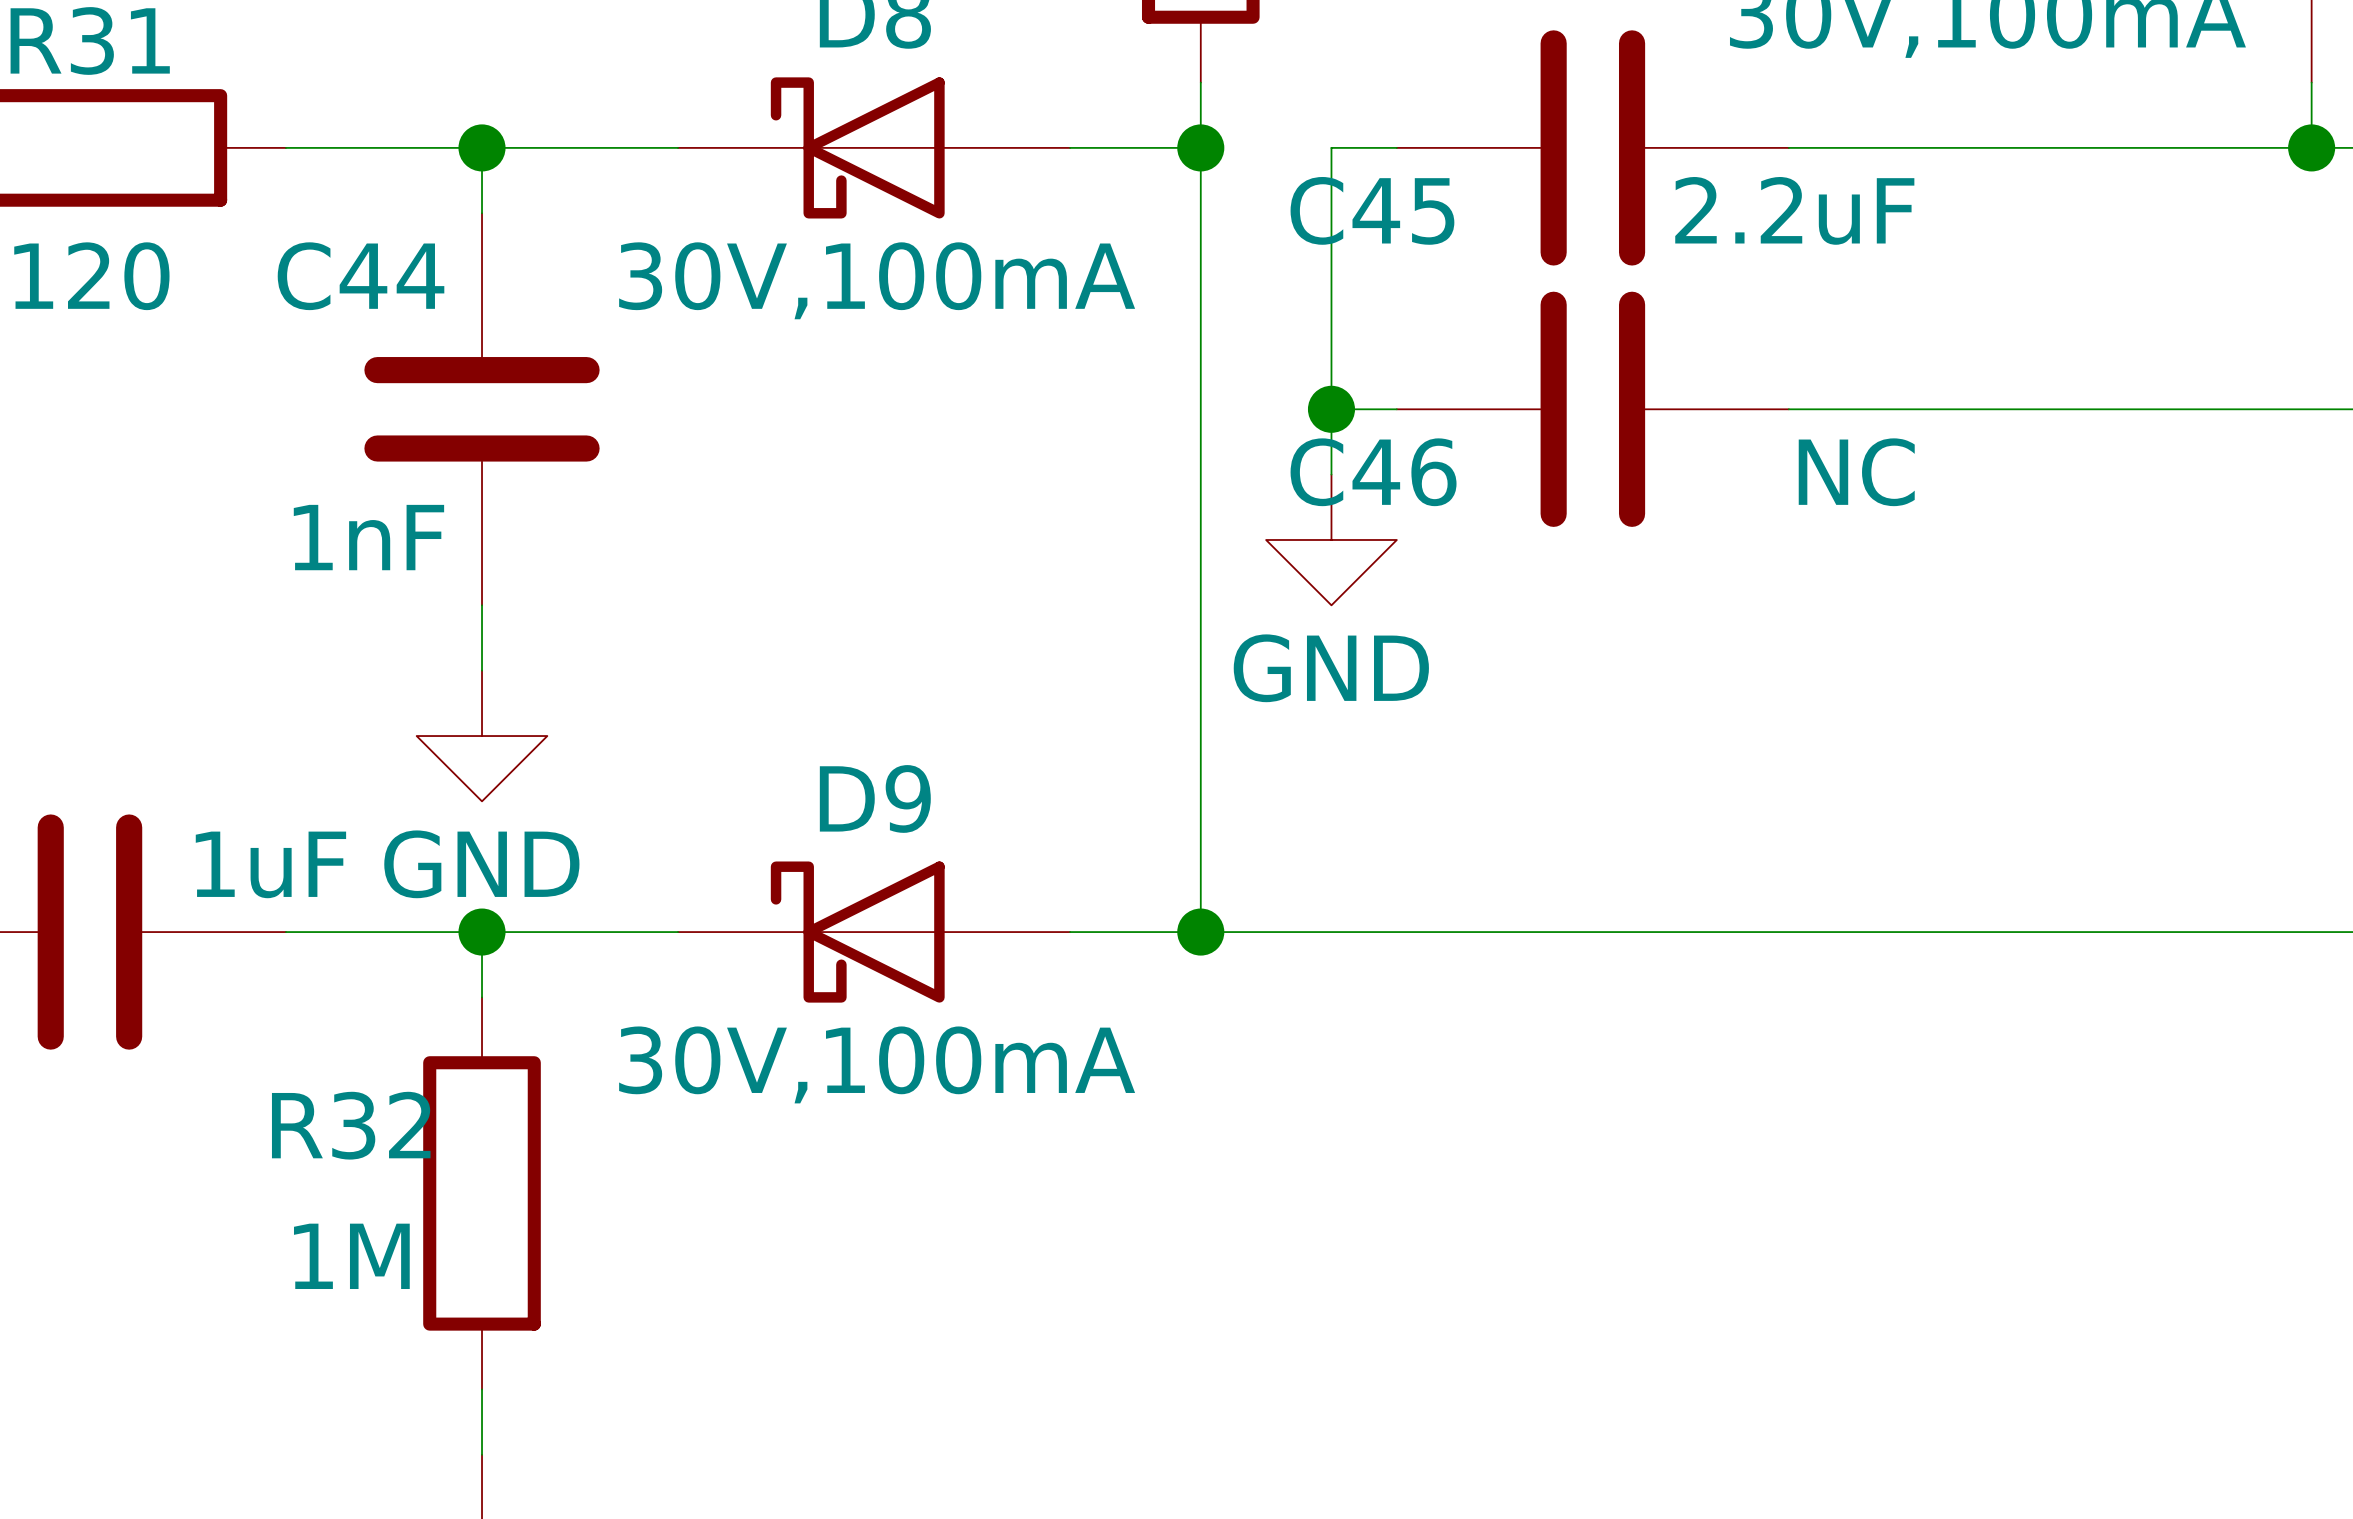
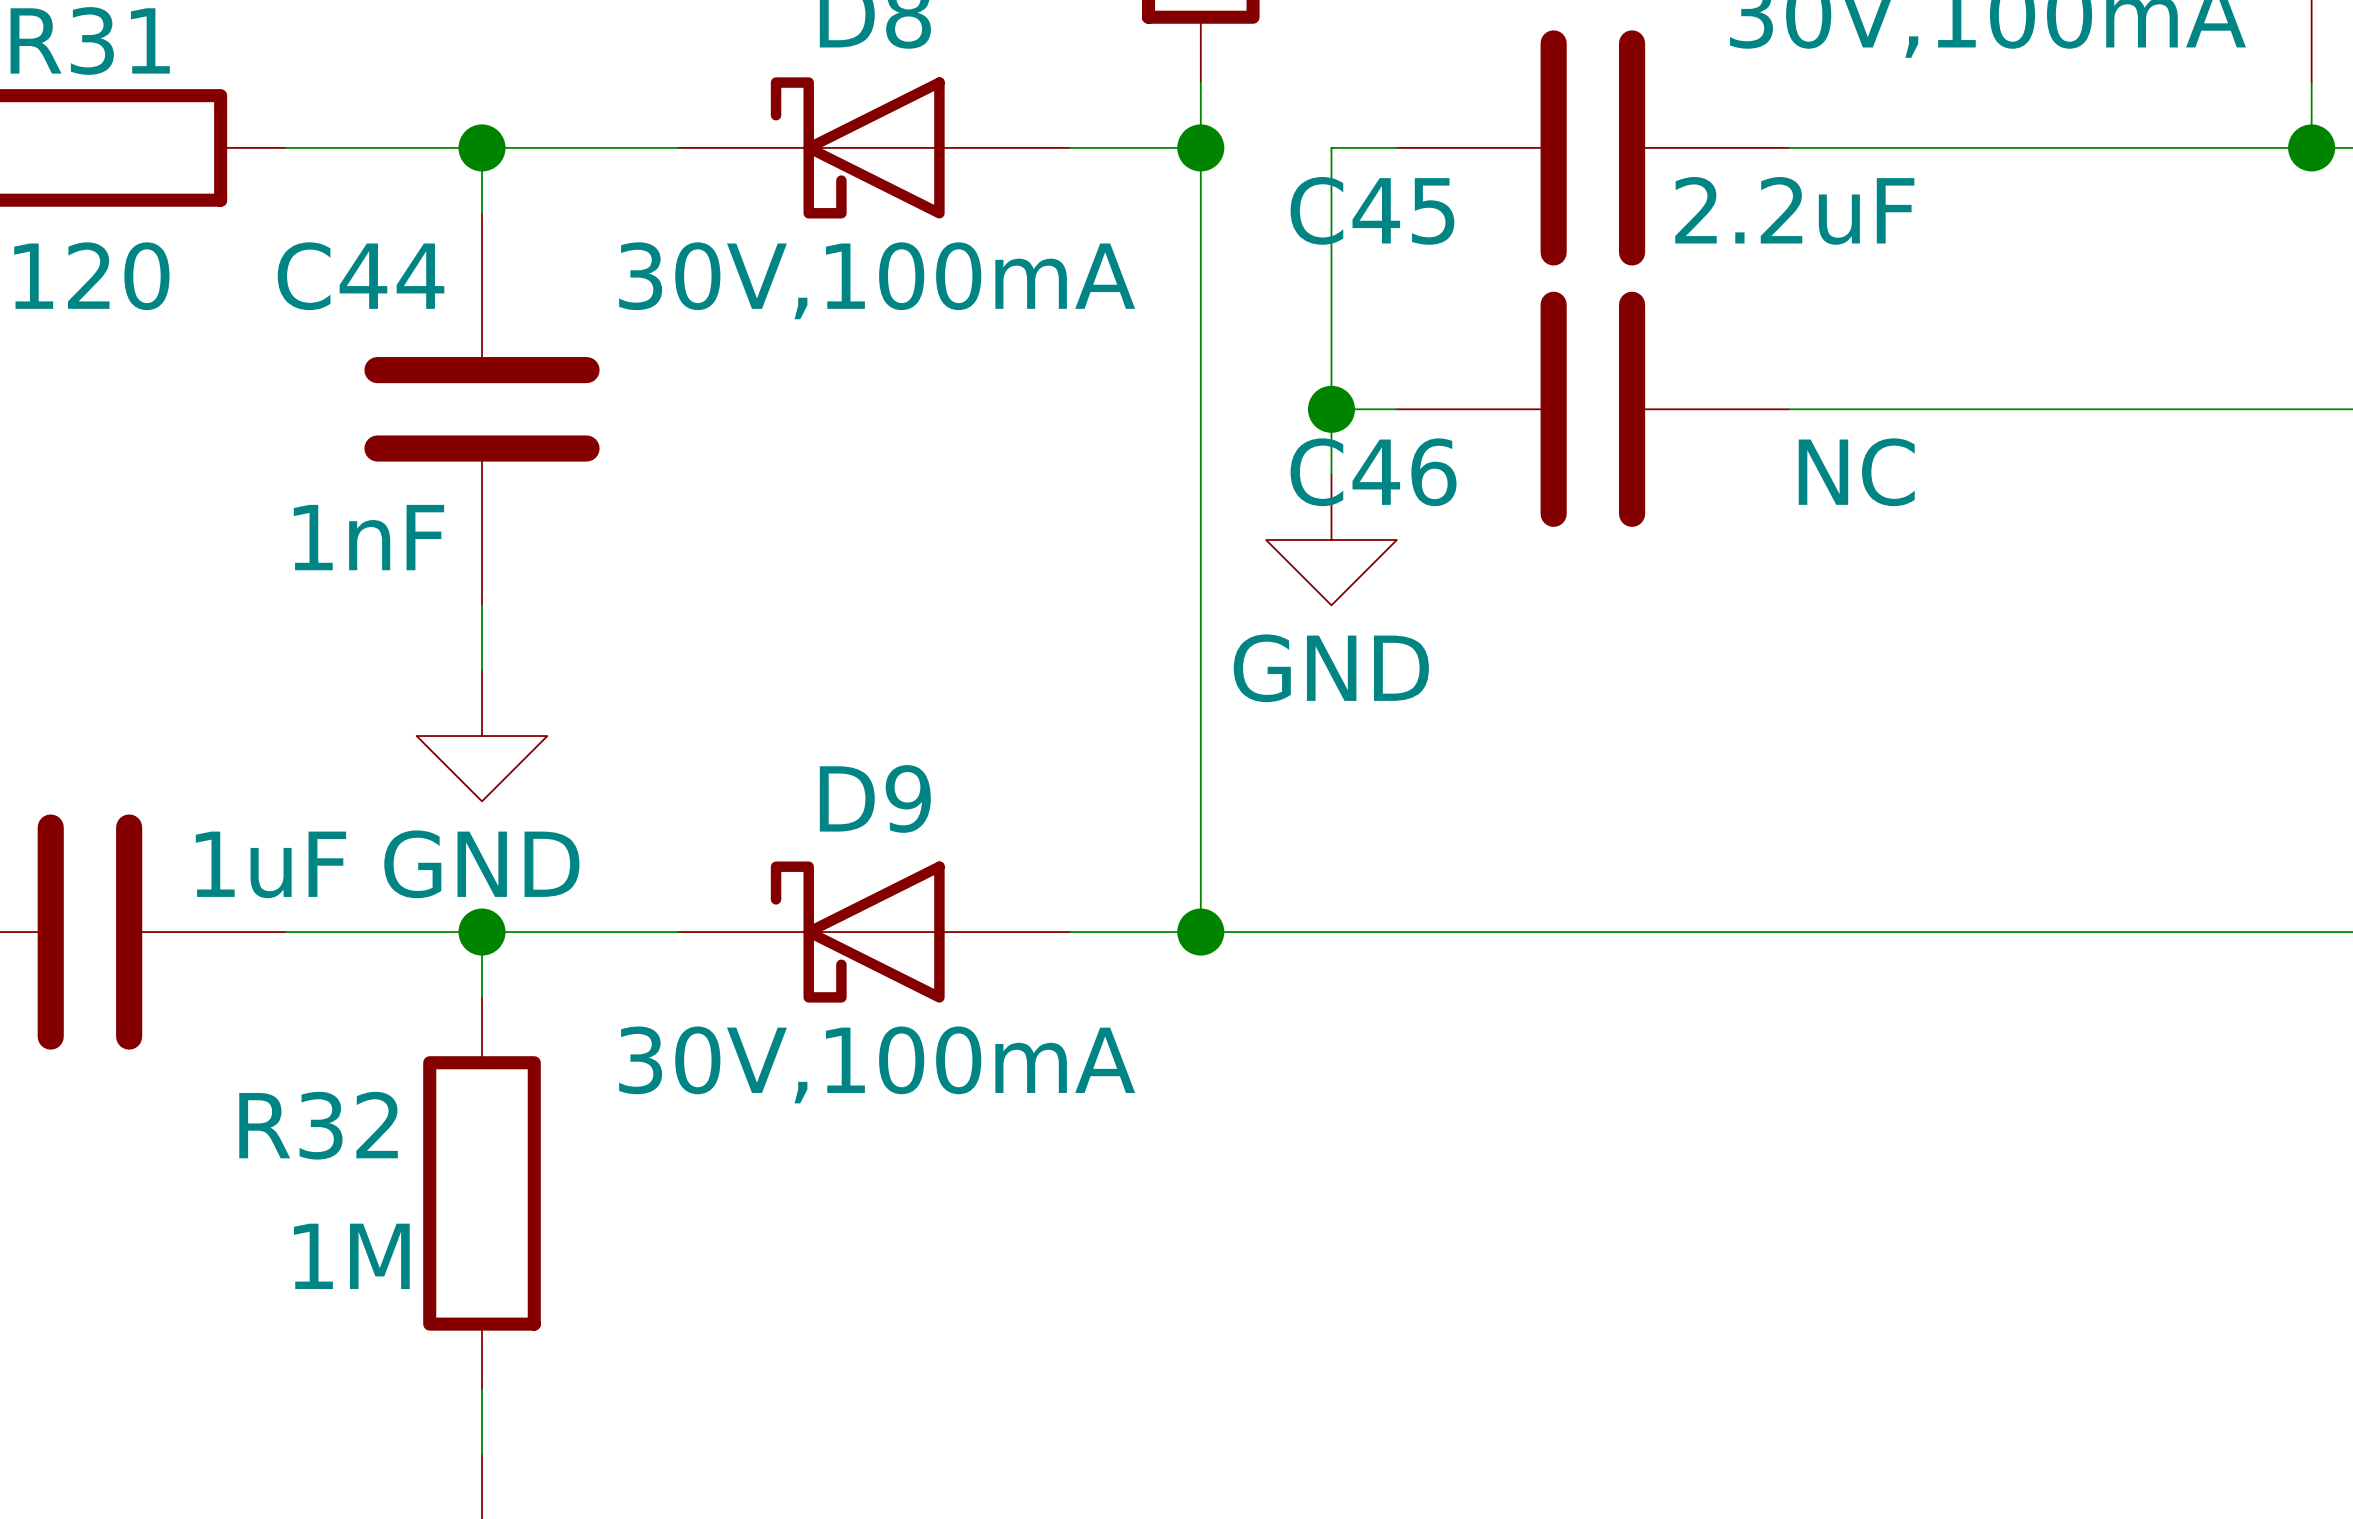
R32 name position: R32 (351, 1125) -> R32 (318, 1125)

